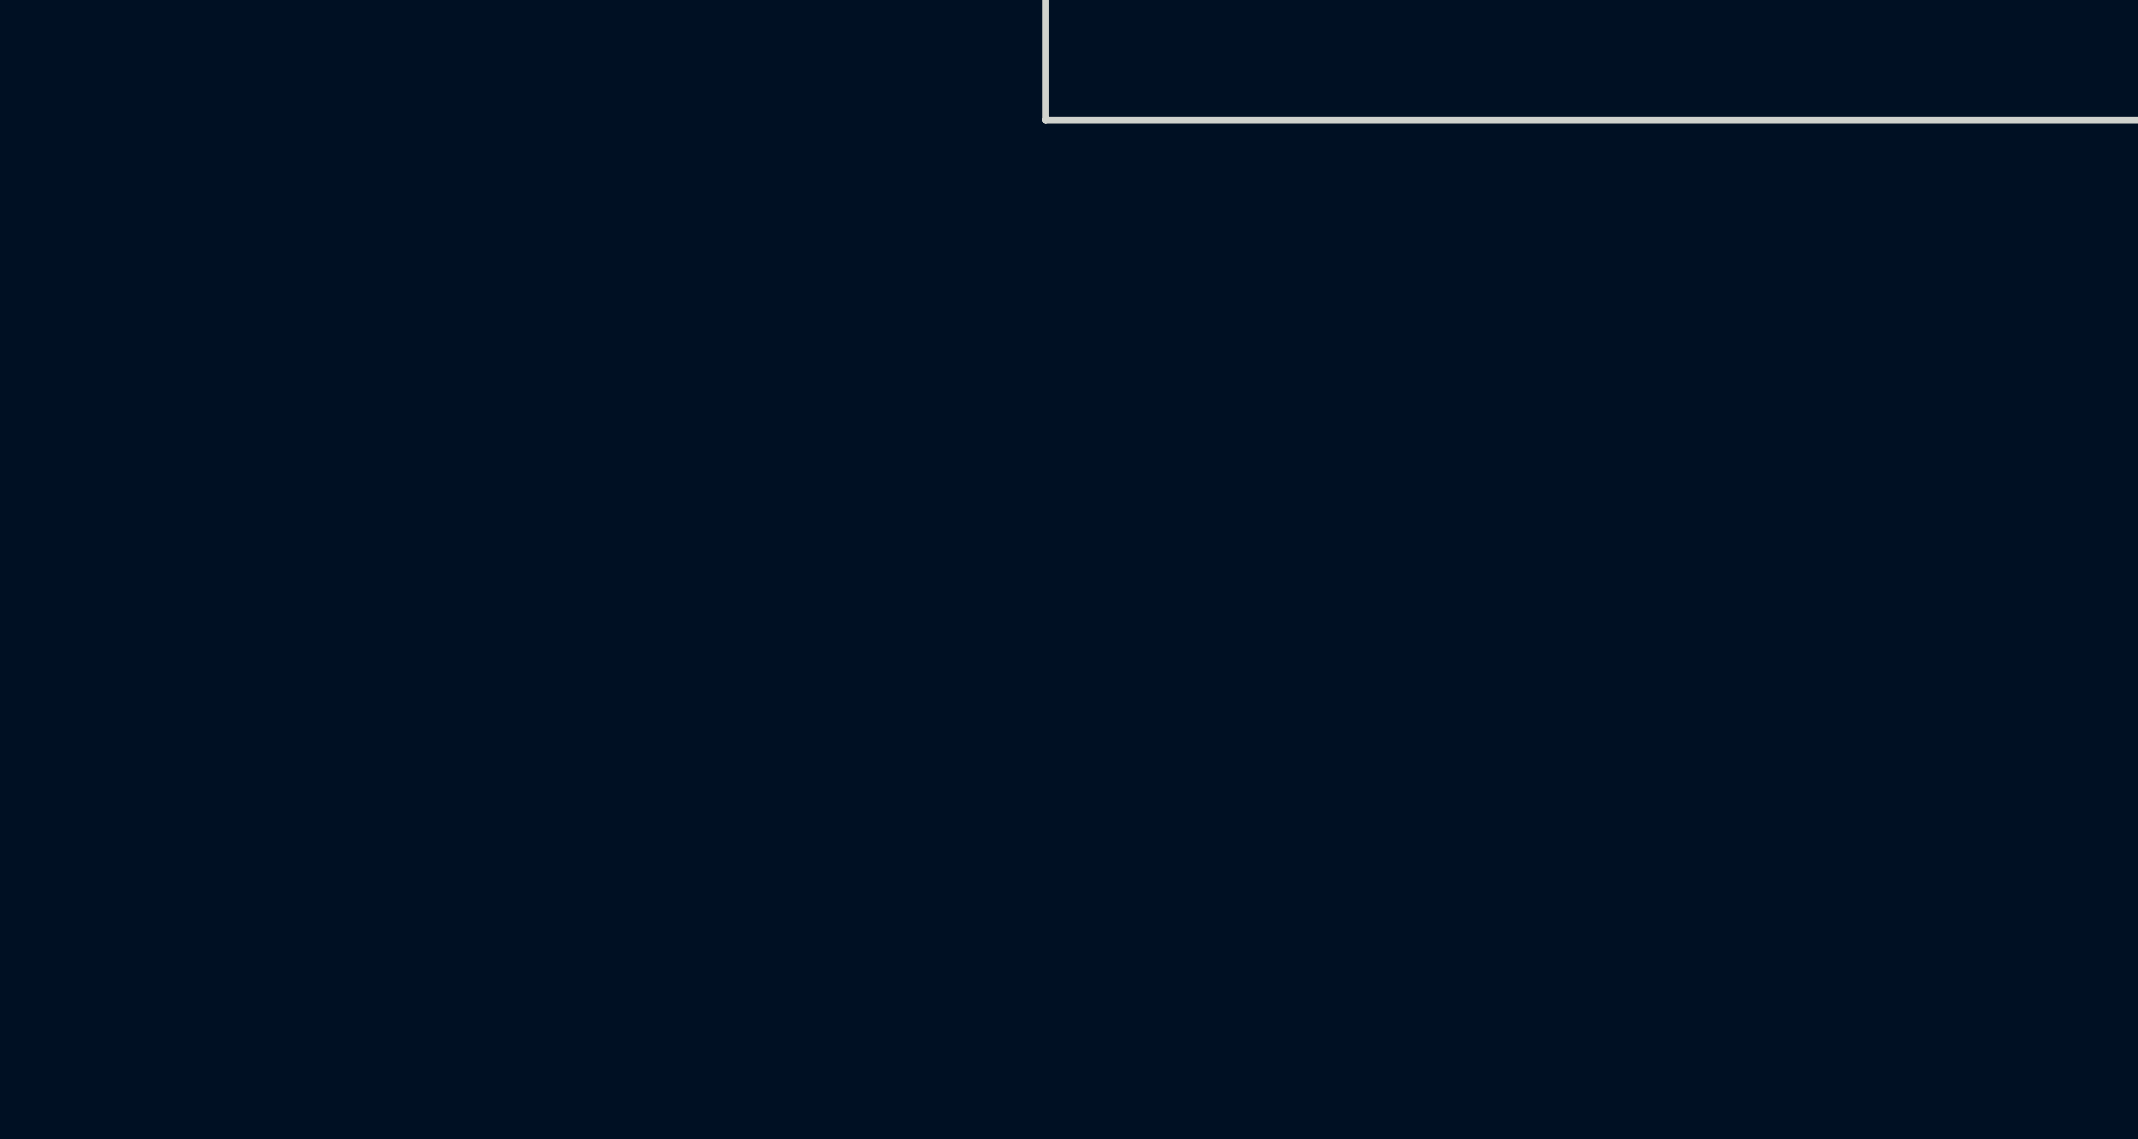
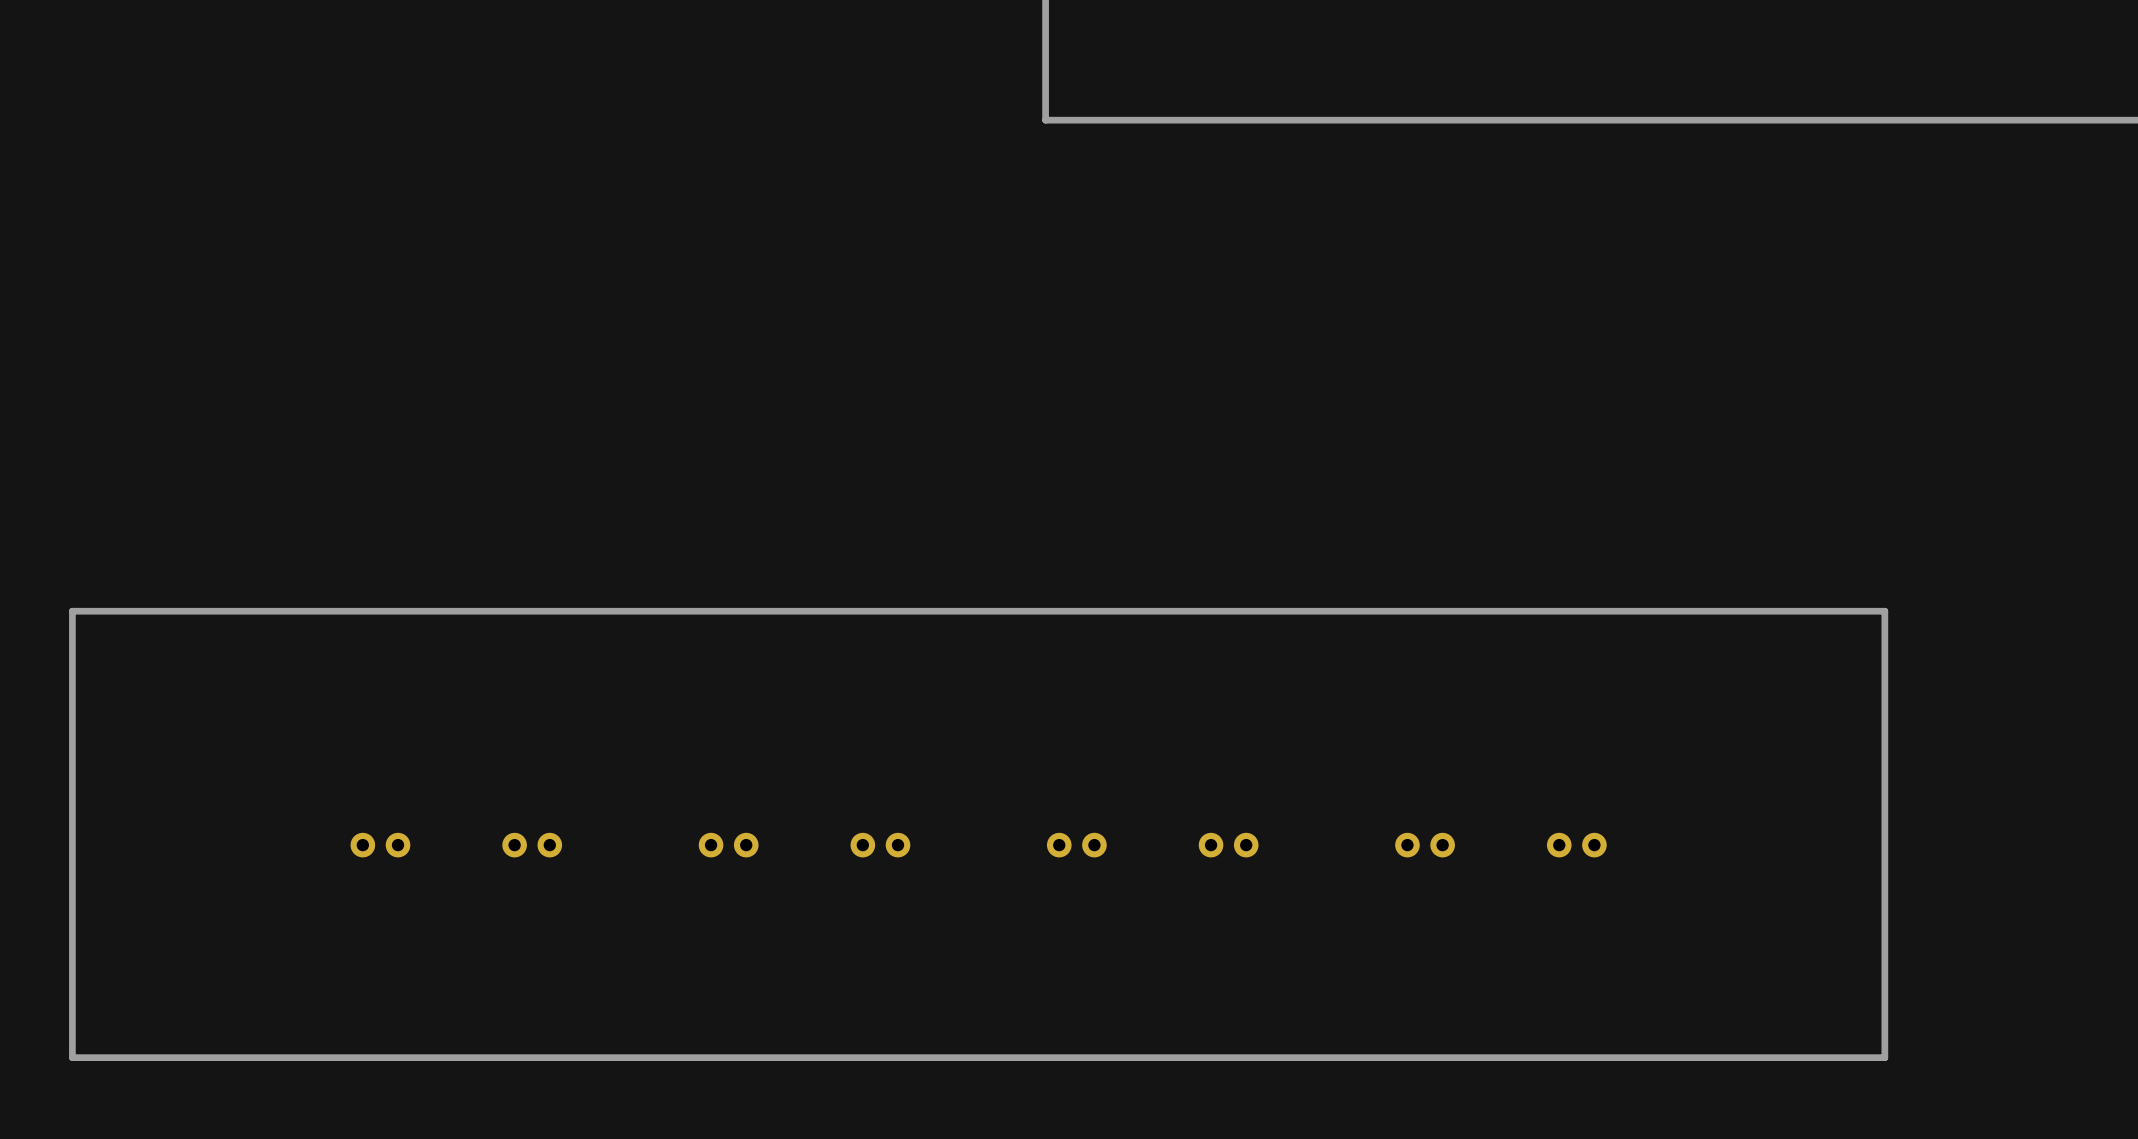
board edge: none -> (1884, 611) (72, 611) (72, 1057) (1884, 1057) (1884, 611)
part: none -> (380, 845)
part: none -> (532, 845)
part: none -> (728, 845)
part: none -> (880, 845)
part: none -> (1076, 845)
part: none -> (1228, 845)
part: none -> (1425, 845)
part: none -> (1576, 845)

